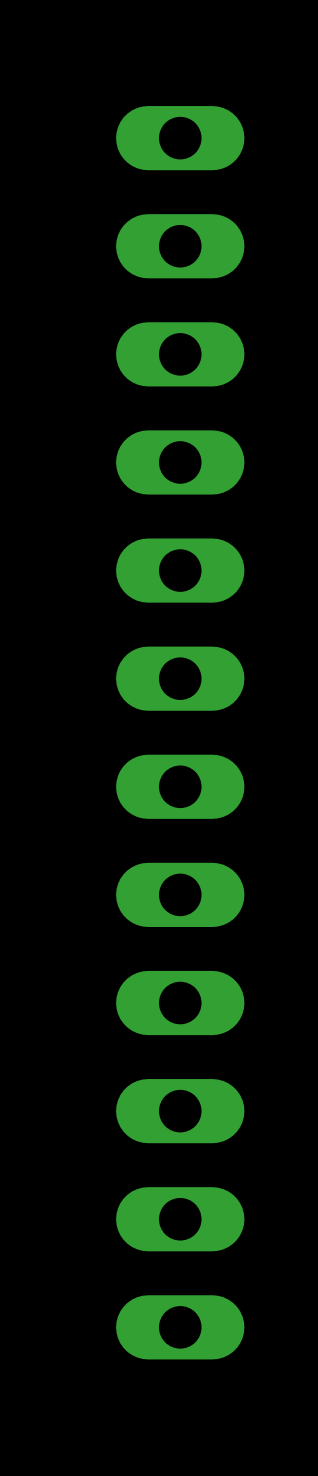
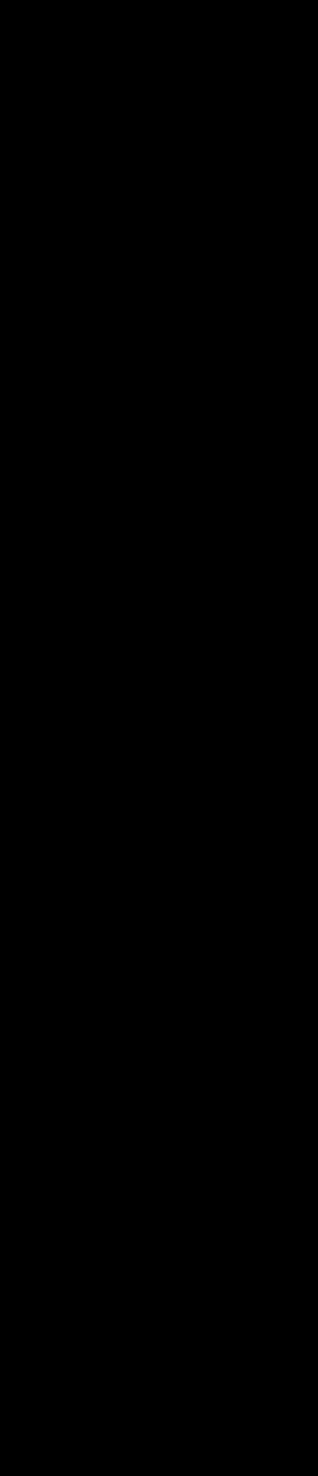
part: (180, 732) -> none

